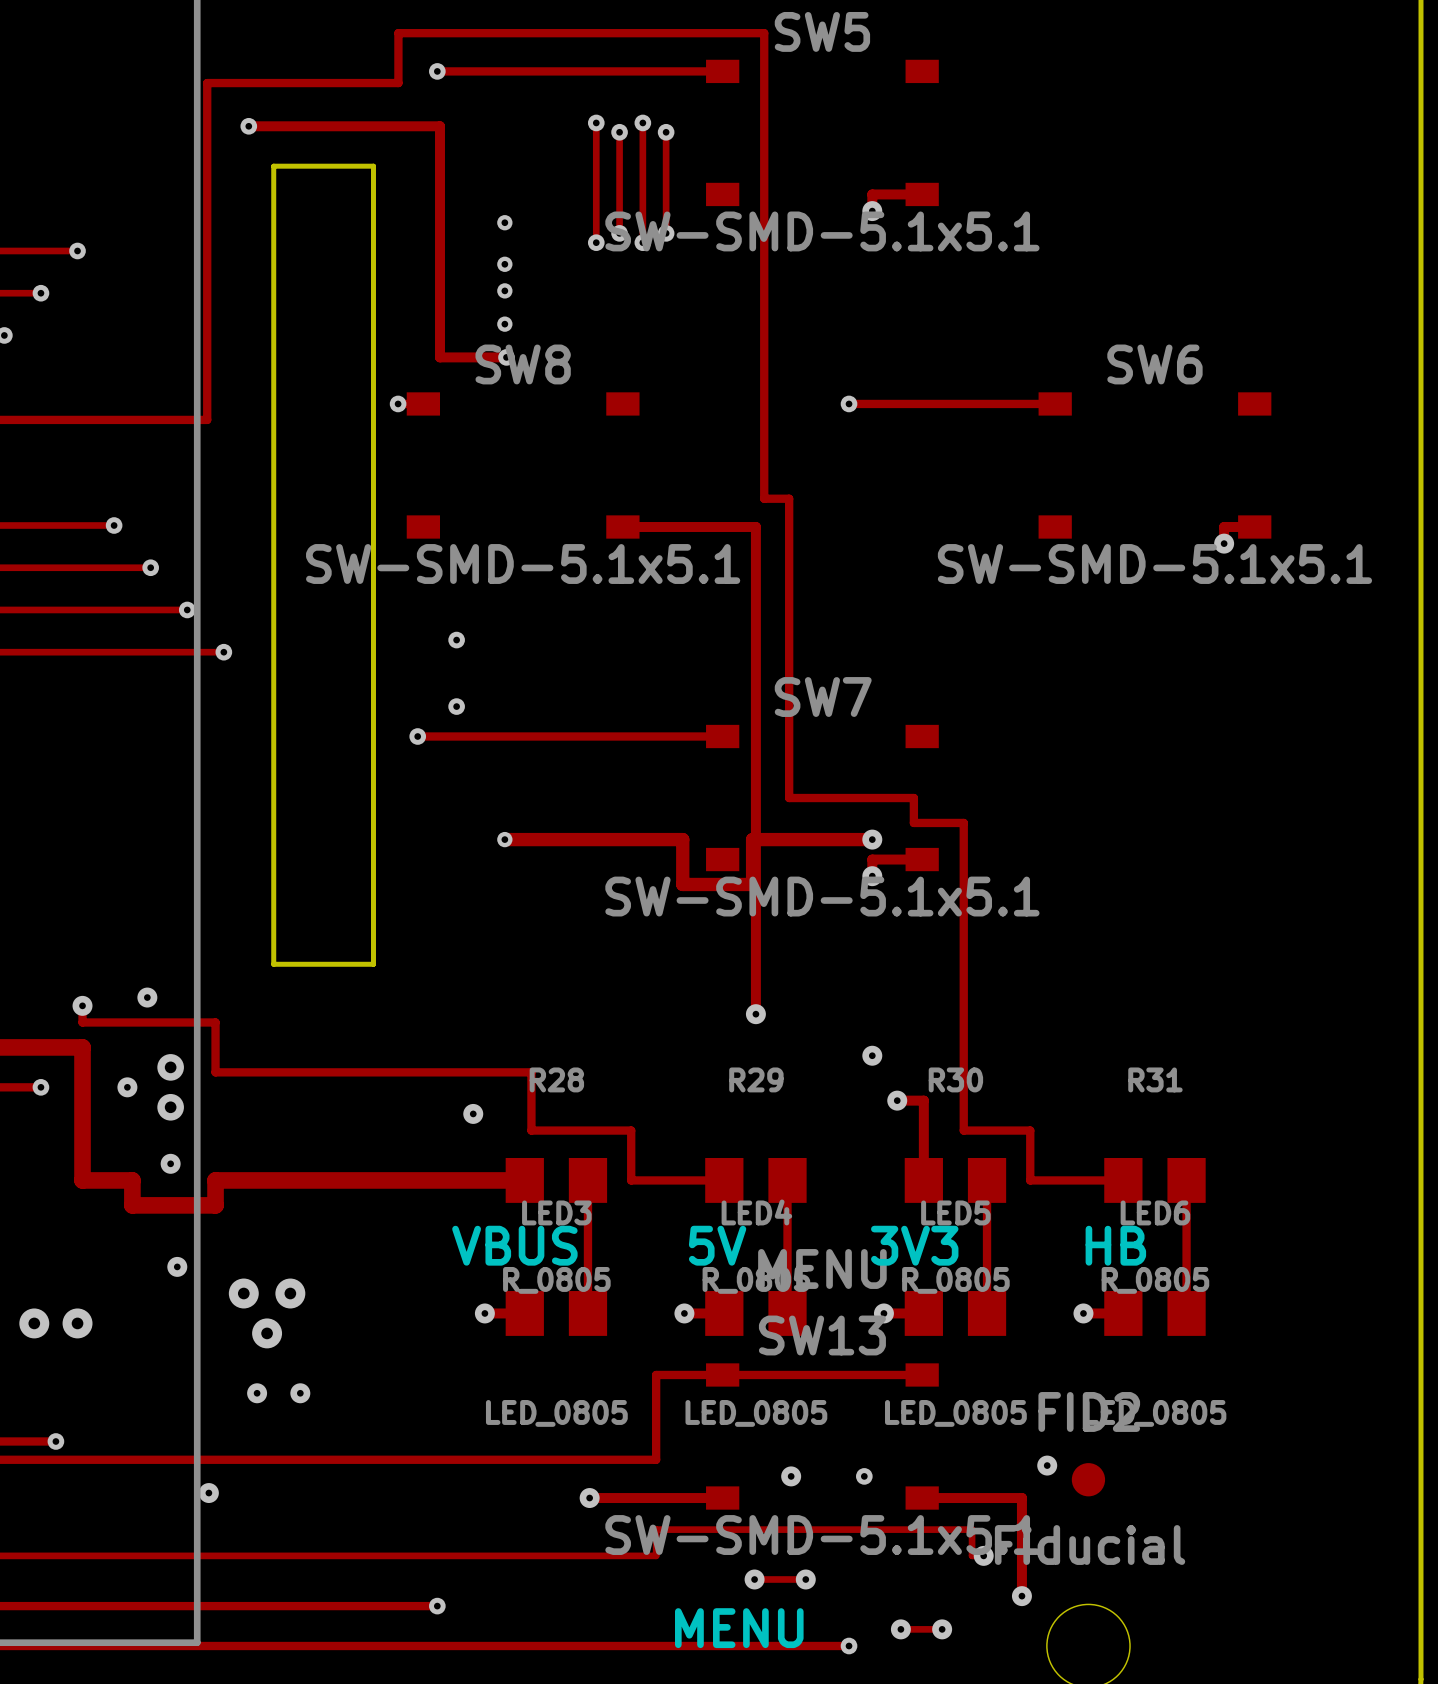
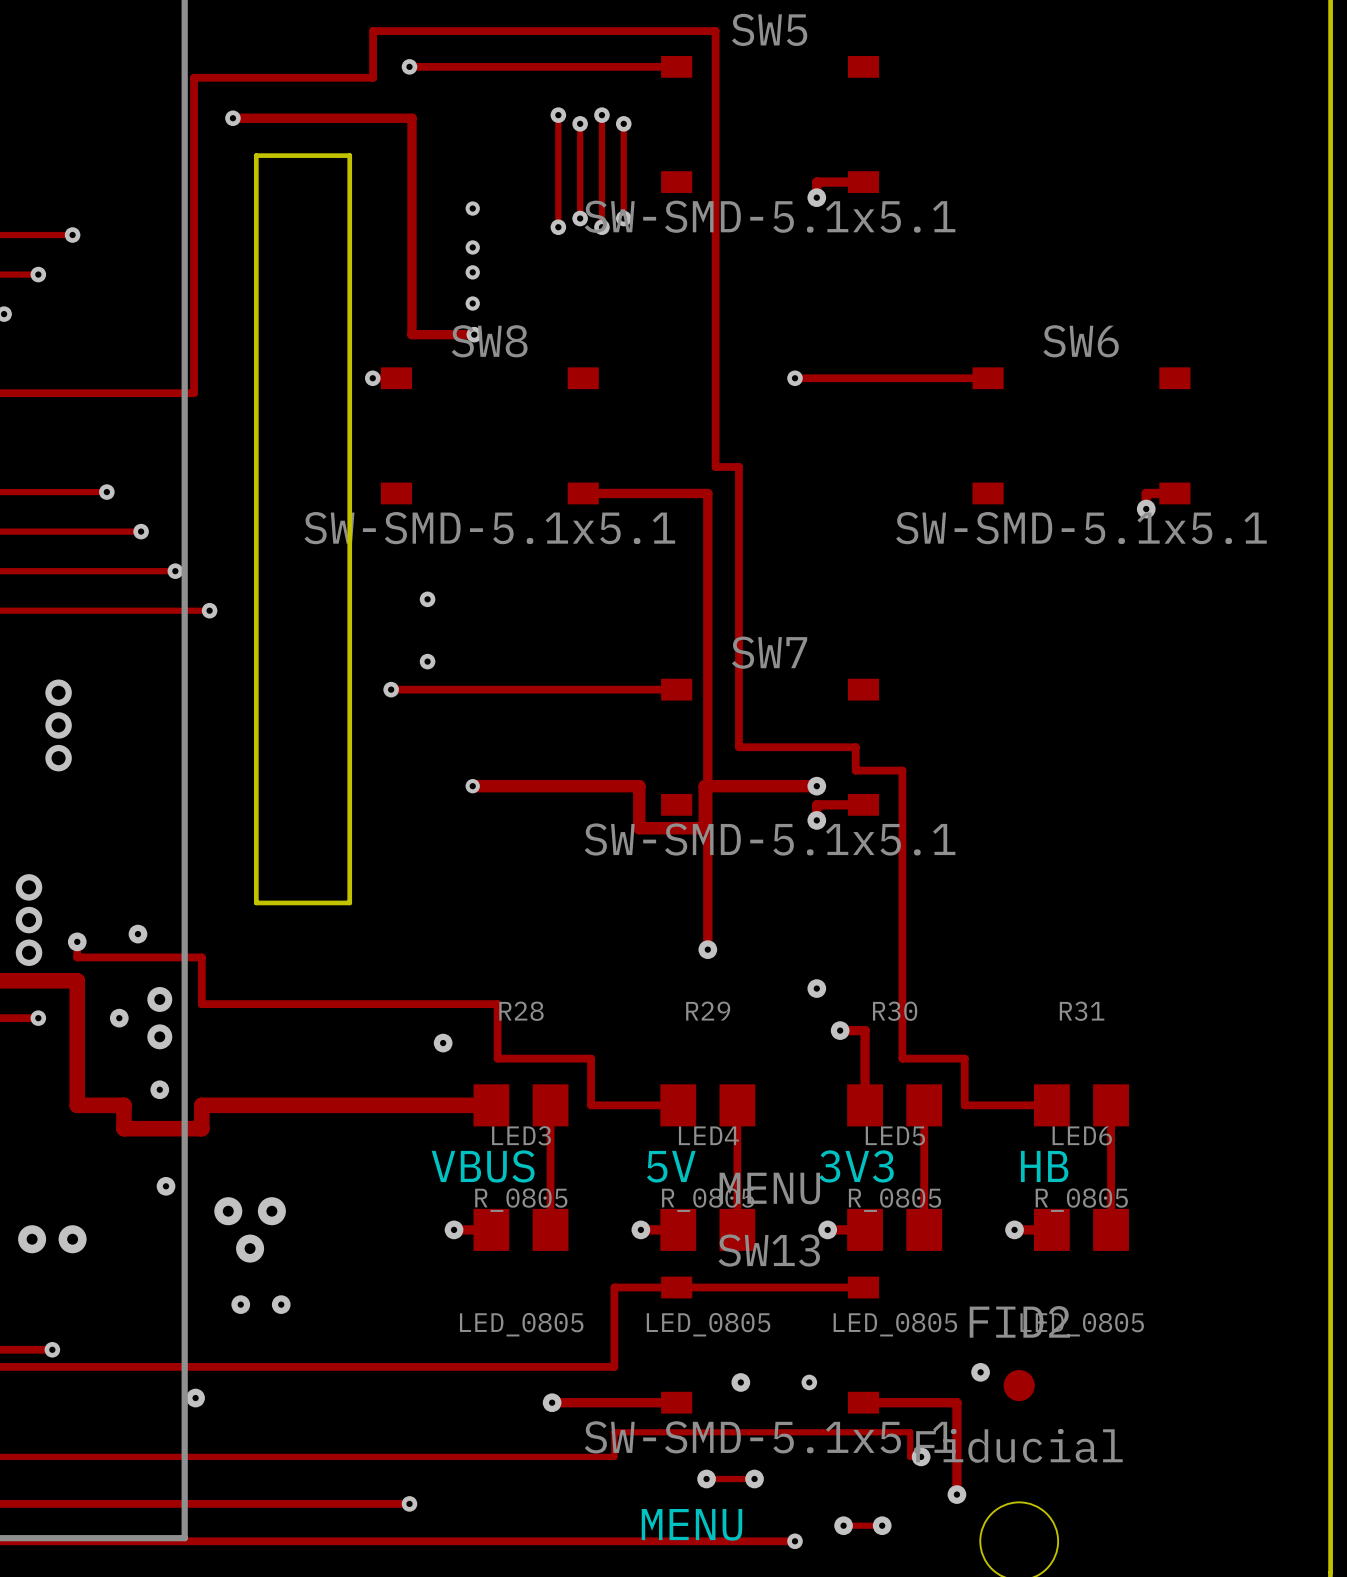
via: none -> (58, 692)
via: none -> (58, 725)
via: none -> (58, 758)
via: none -> (29, 887)
via: none -> (29, 920)
via: none -> (29, 952)

